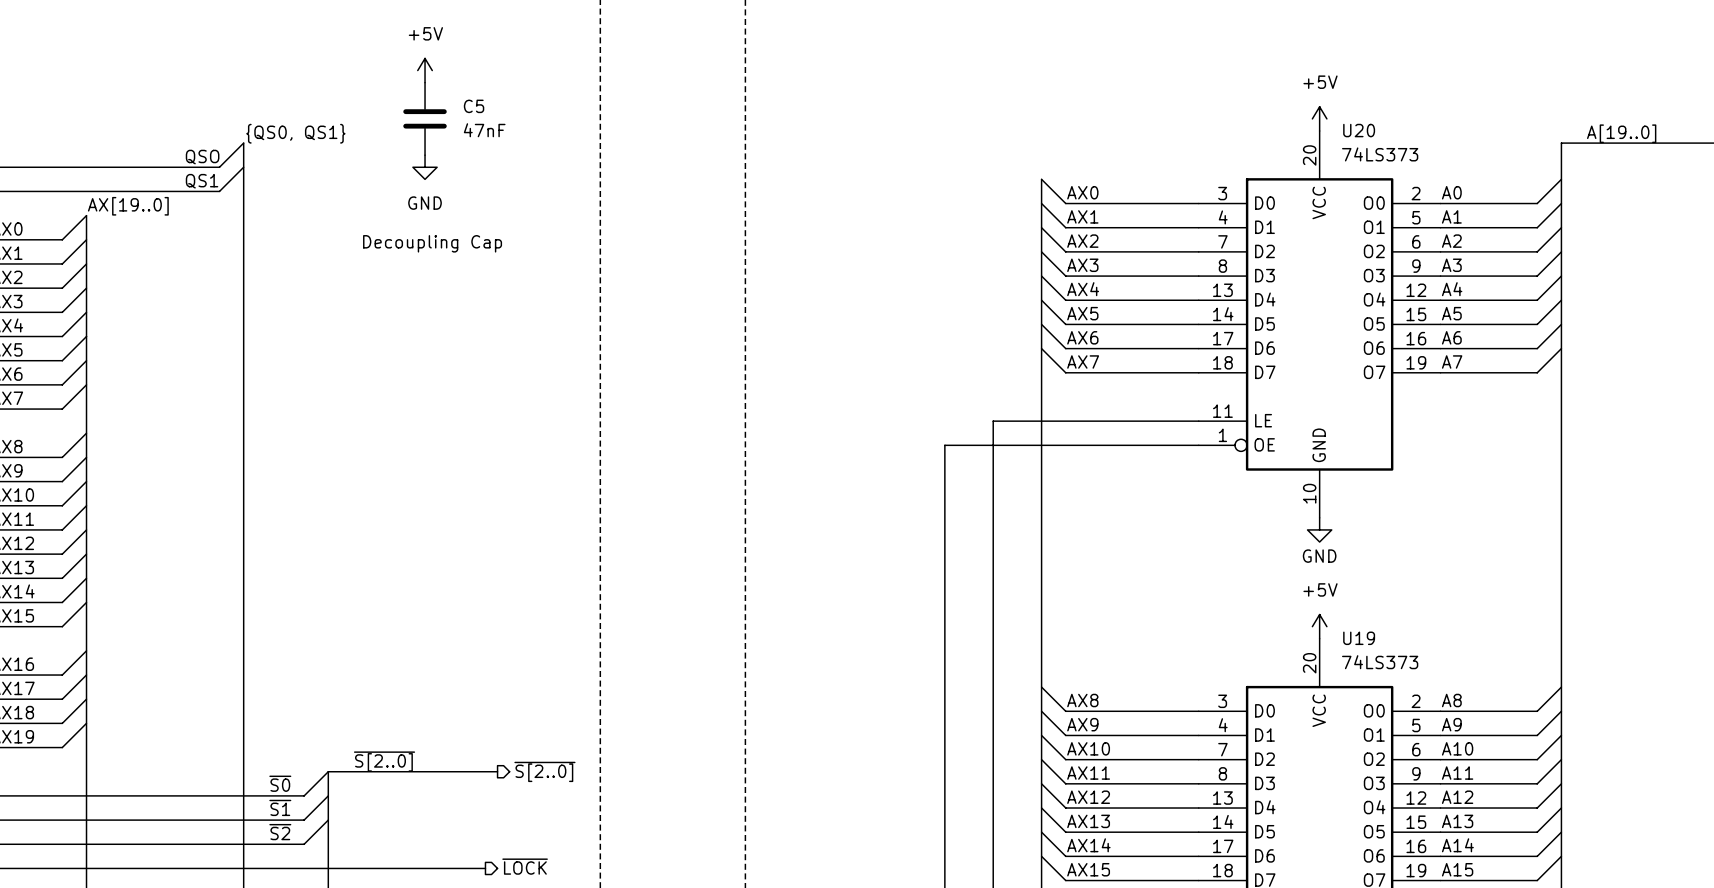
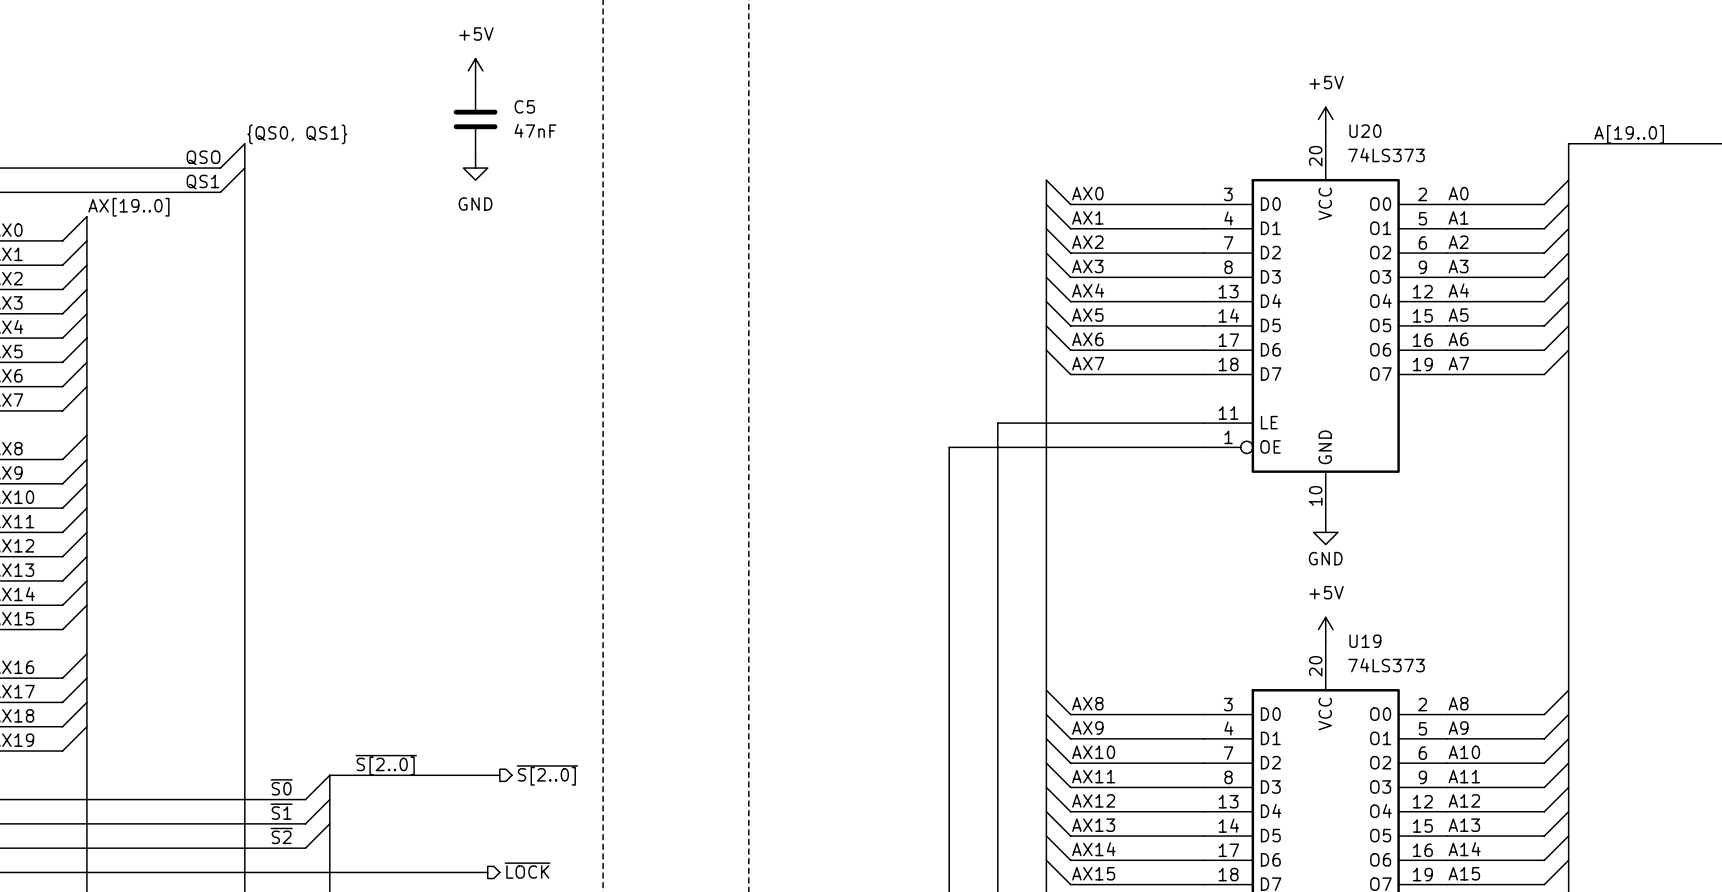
power symbol position: +5V (425, 70) -> +5V (475, 70)
C5 position: (425, 118) -> (475, 119)
power symbol position: GND (425, 167) -> GND (475, 168)
text: Decoupling Cap (432, 243) -> none

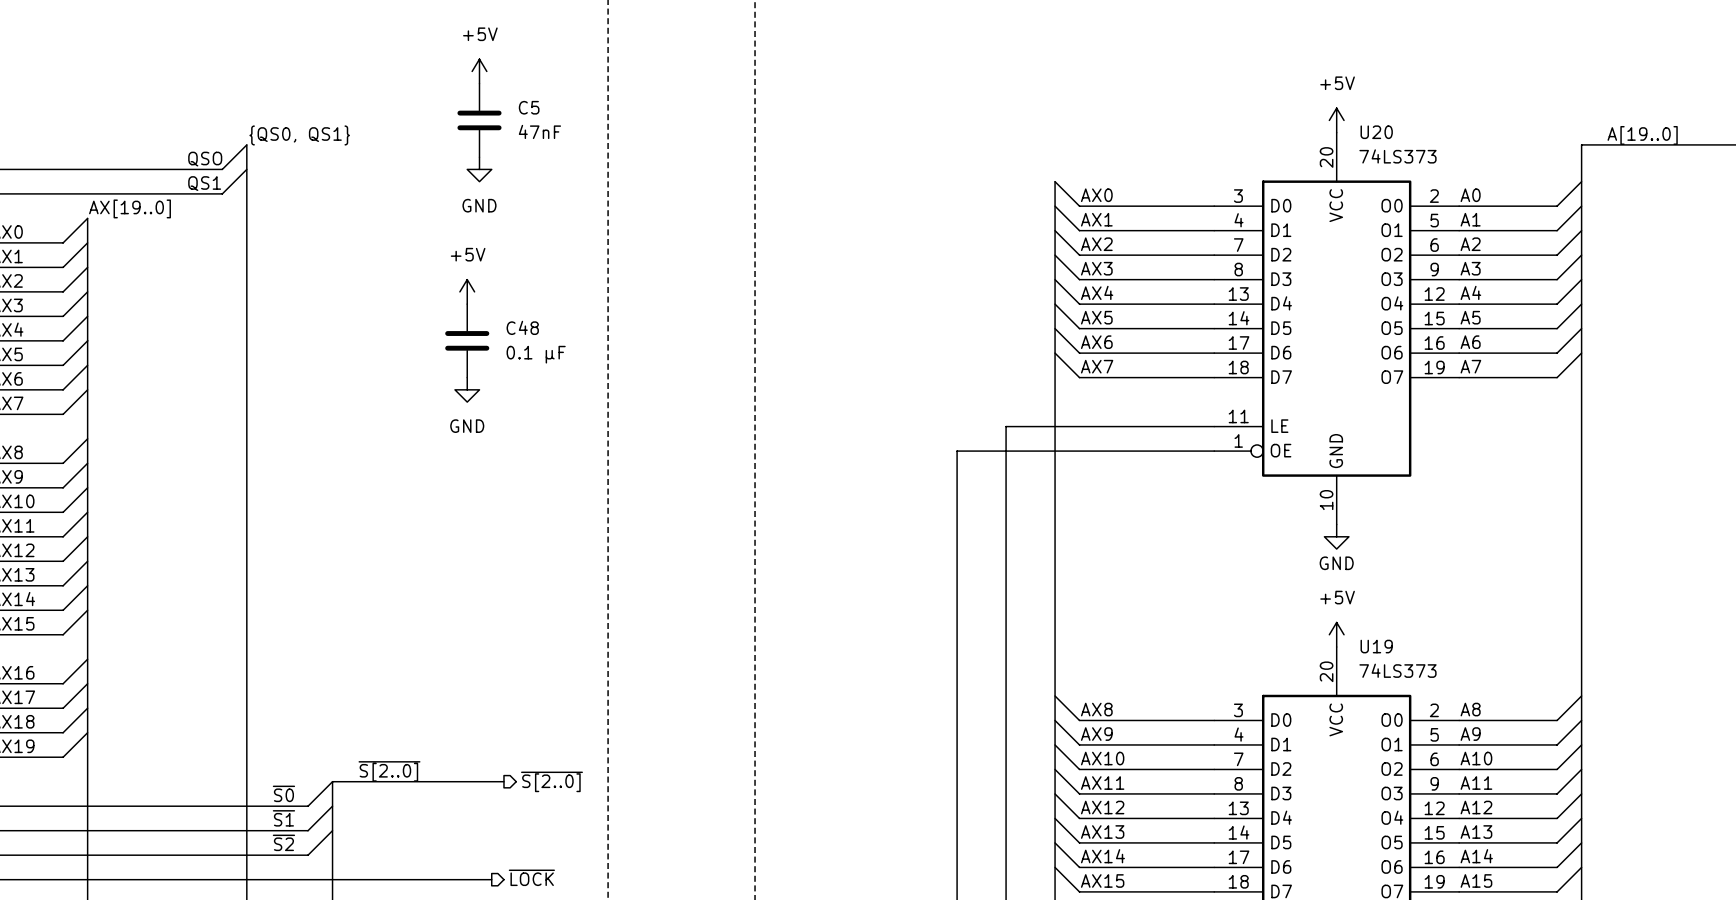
power symbol: none -> +5V (467, 291)
C48: none -> 0.1 μF (467, 340)
power symbol: none -> GND (467, 389)

